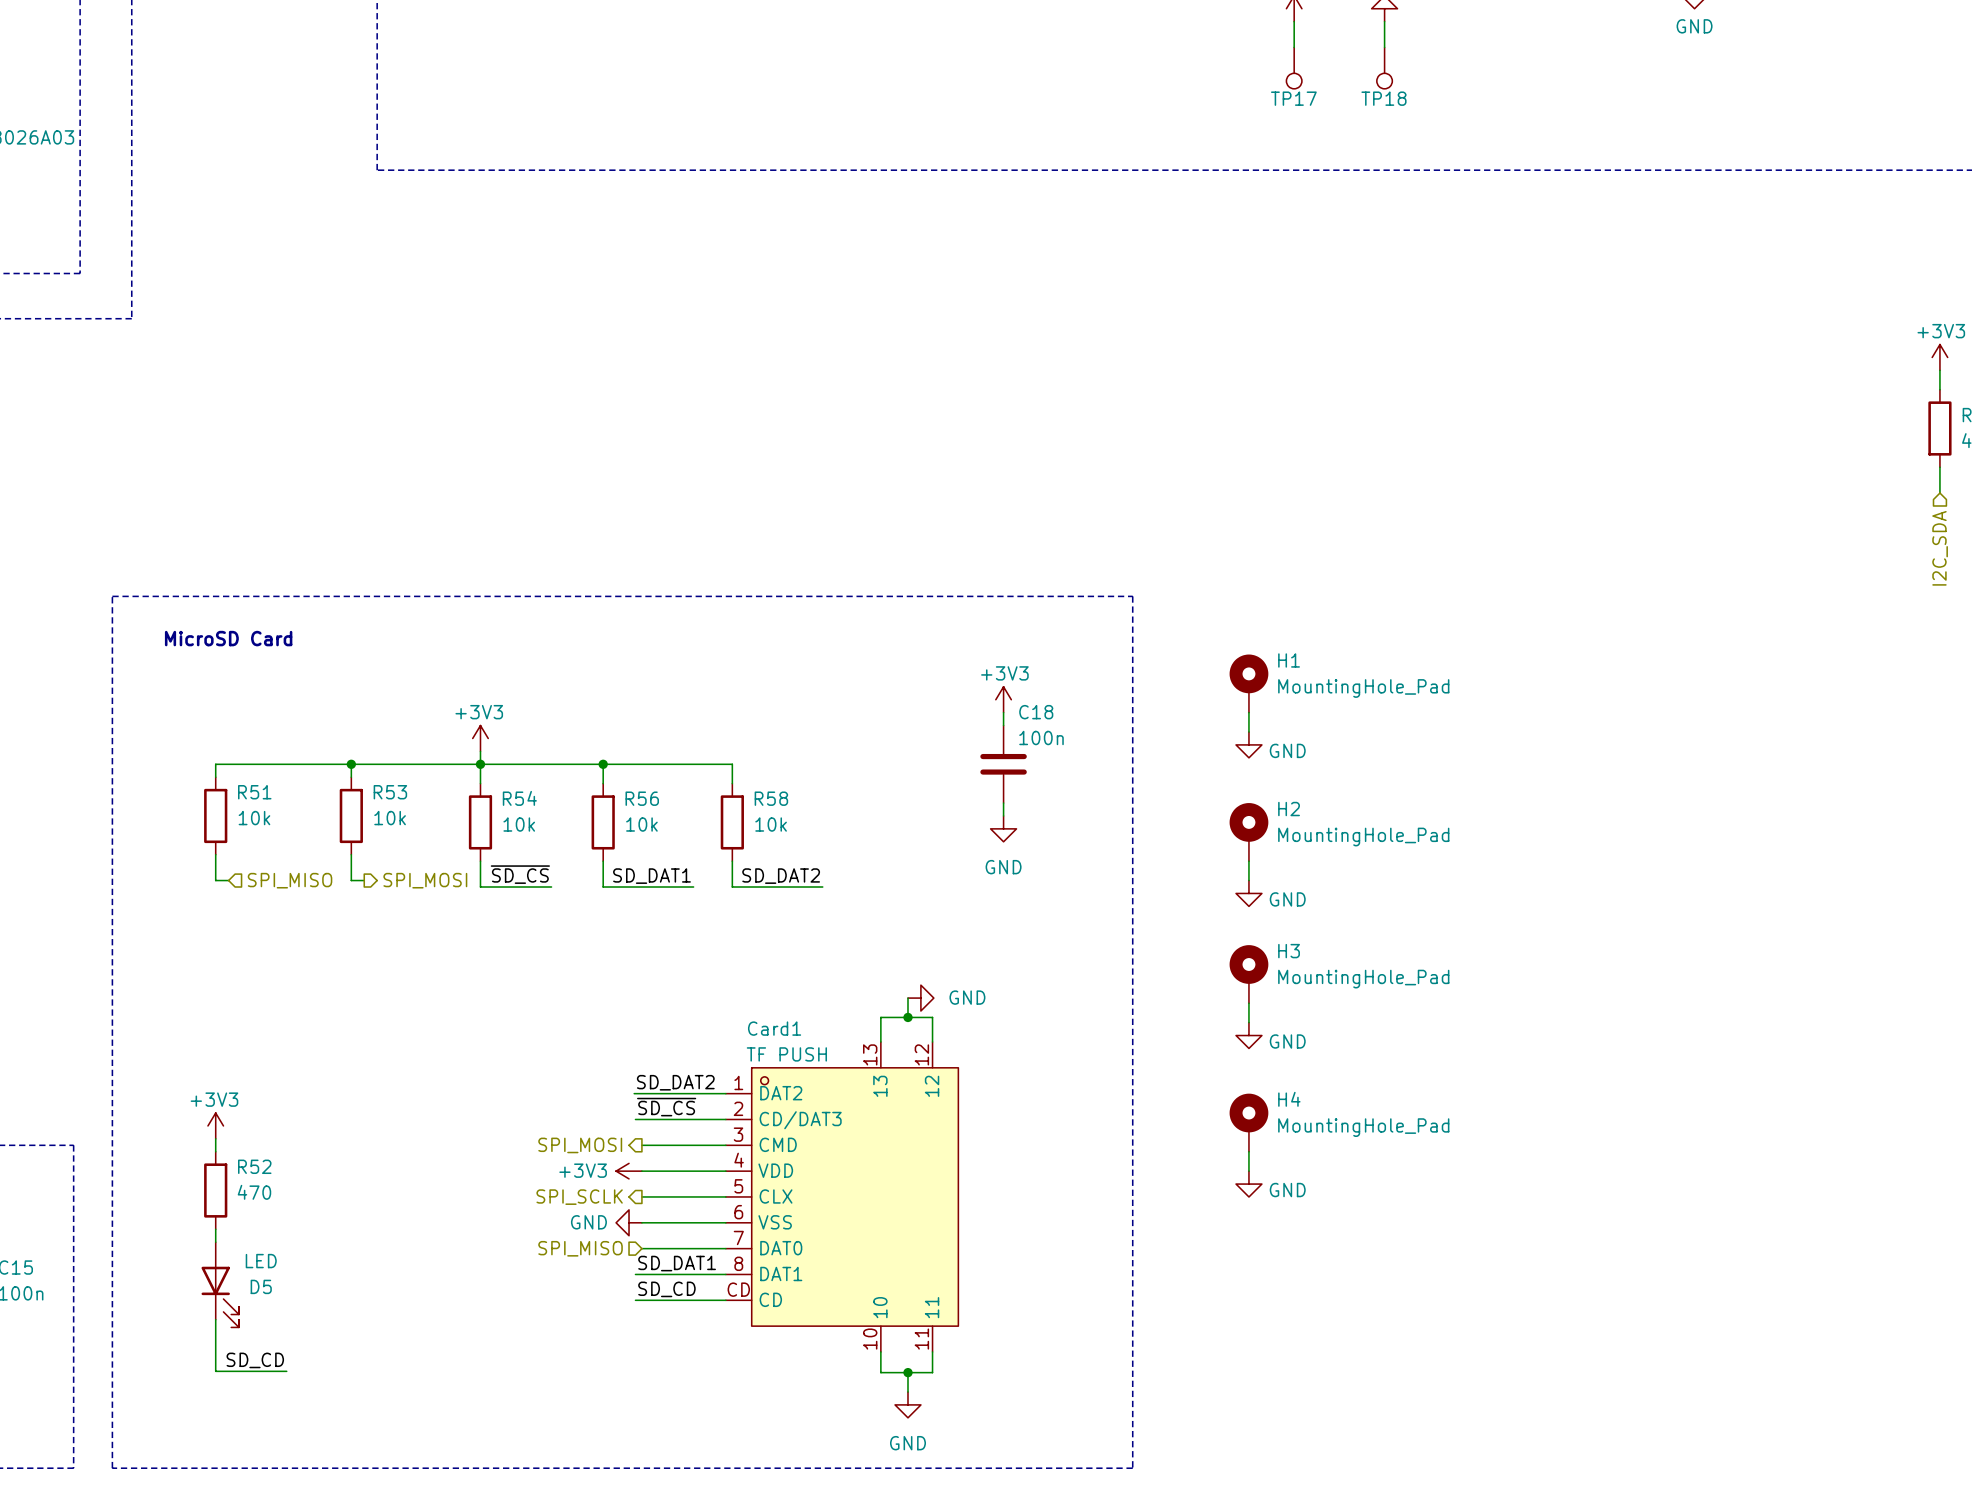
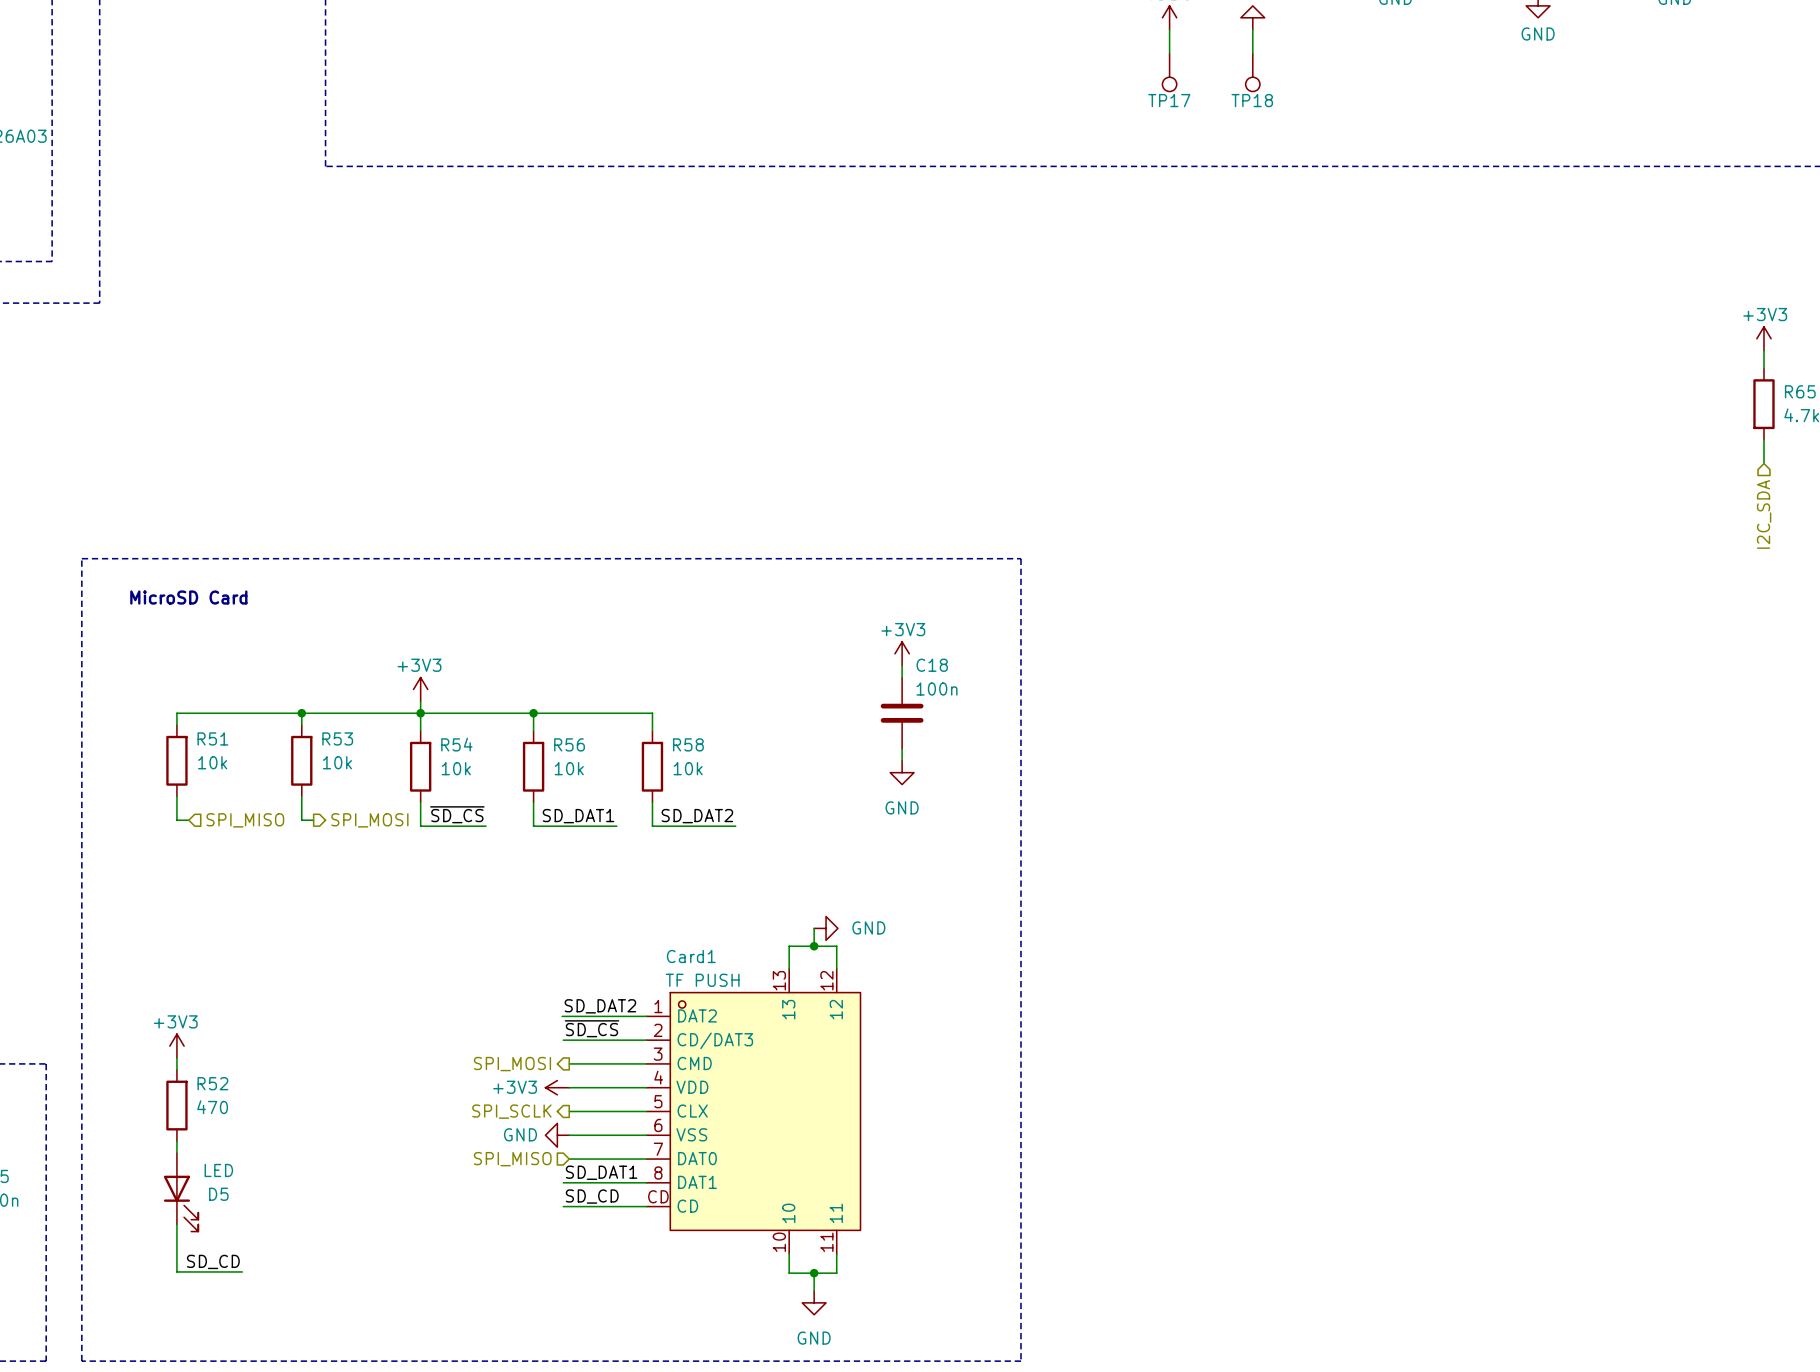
H1: MountingHole_Pad (1248, 683) -> none
wire: (1248, 712) (1248, 732) -> none
power symbol: GND (1248, 744) -> none
H2: MountingHole_Pad (1248, 832) -> none
wire: (1248, 861) (1248, 880) -> none
power symbol: GND (1248, 893) -> none
H3: MountingHole_Pad (1248, 974) -> none
wire: (1248, 1003) (1248, 1022) -> none
power symbol: GND (1248, 1035) -> none
H4: MountingHole_Pad (1248, 1122) -> none
wire: (1248, 1151) (1248, 1171) -> none
power symbol: GND (1248, 1184) -> none

